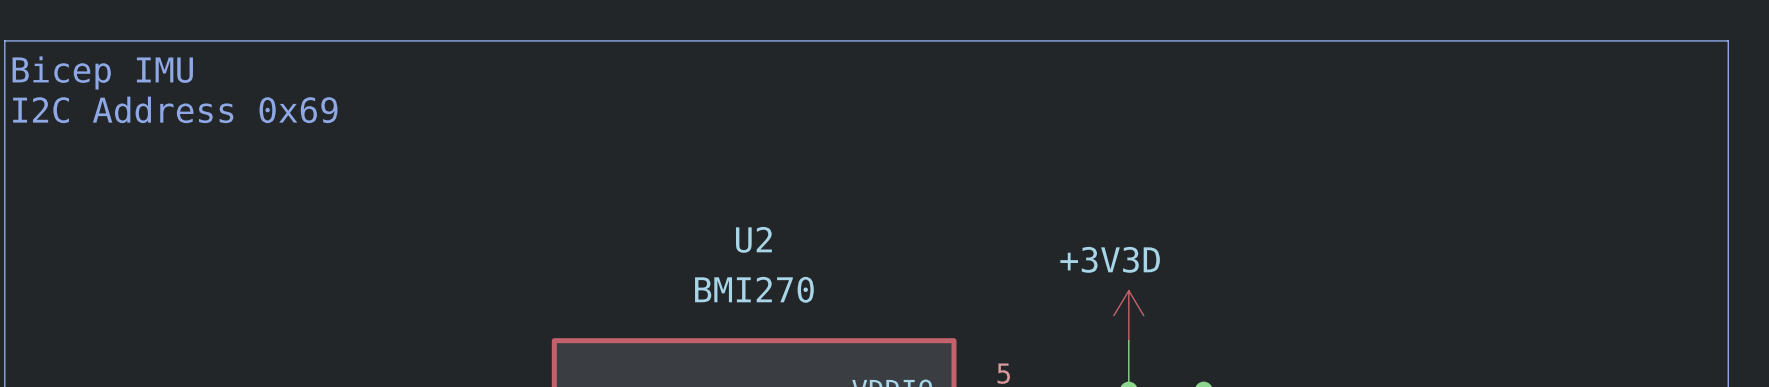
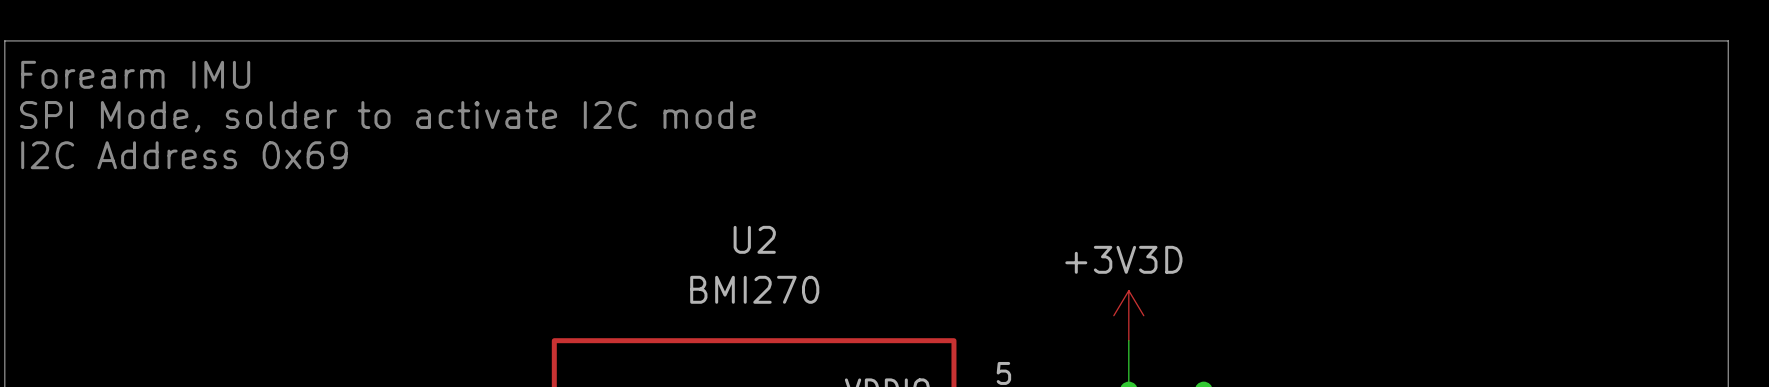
text: Bicep IMU (102, 72) -> Forearm IMU (135, 74)
text position: I2C Address 0x69 (175, 109) -> I2C Address 0x69 (184, 155)
text: none -> SPI Mode, solder to activate I2C mode (387, 116)

